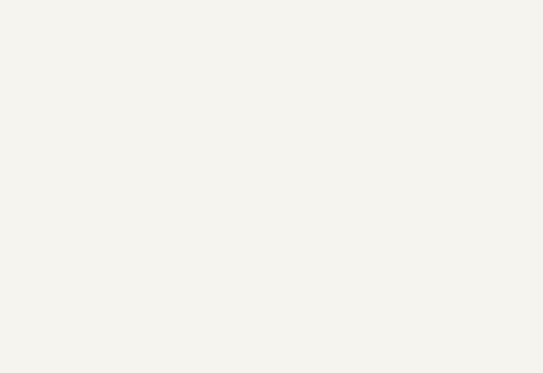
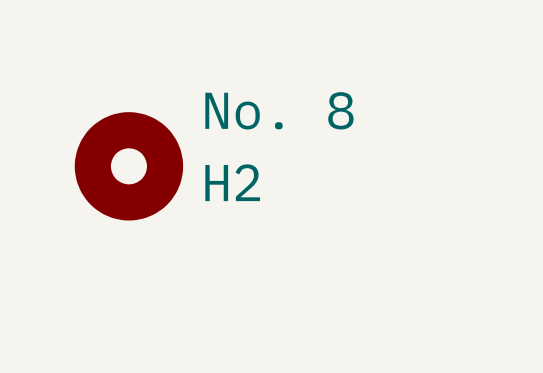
H2: none -> No. 8 (128, 166)

